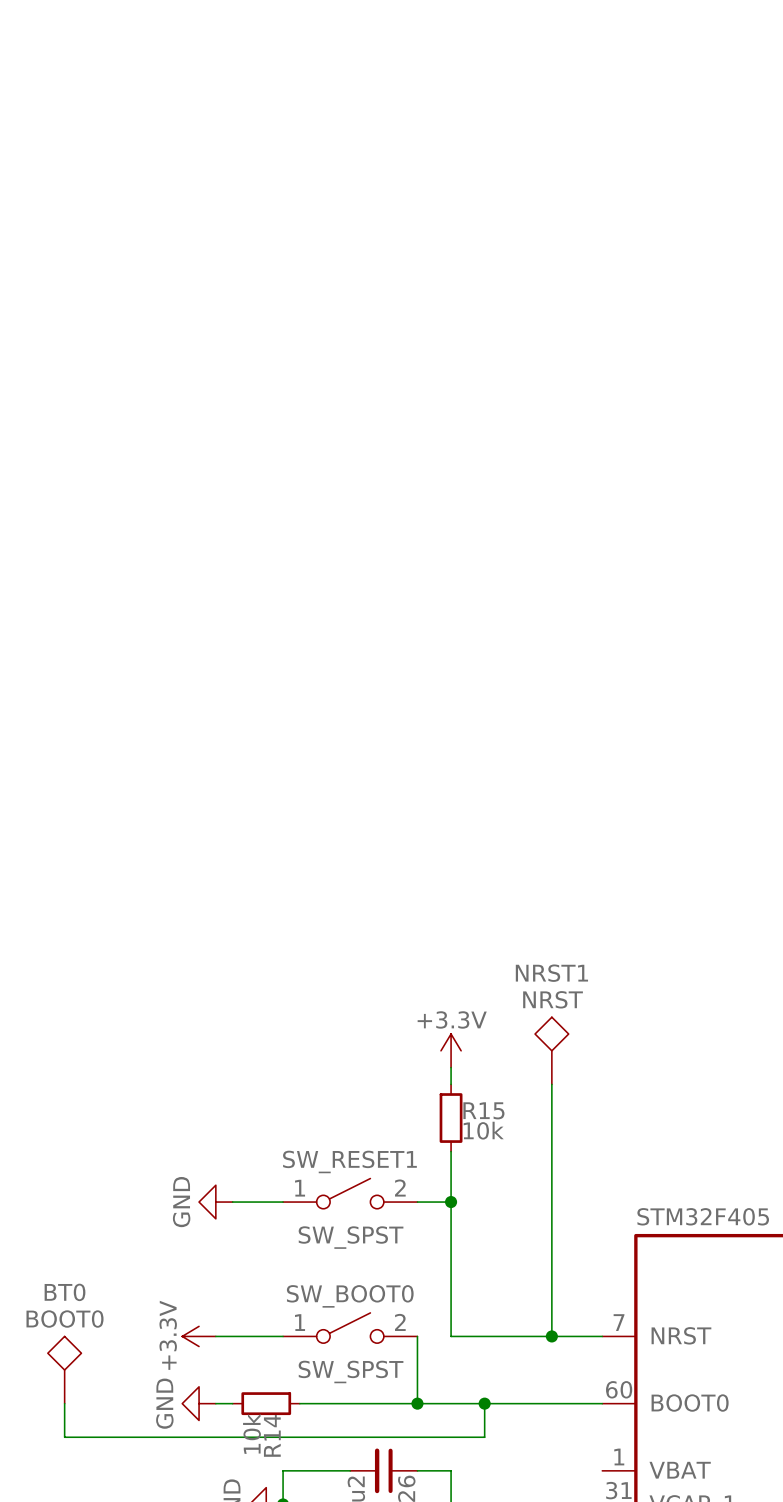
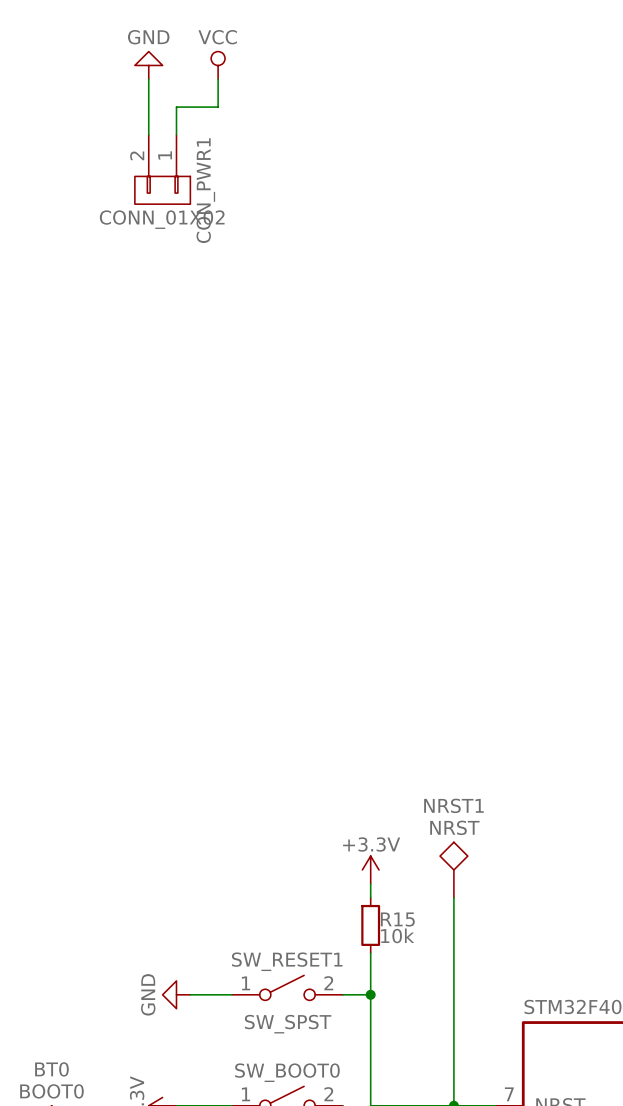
power symbol: none -> GND (148, 65)
power symbol: none -> VCC (218, 65)
wire: none -> (148, 79) (148, 134)
wire: none -> (218, 79) (218, 107) (176, 107) (176, 134)
CON_PWR1: none -> CONN_01X02 (162, 169)

